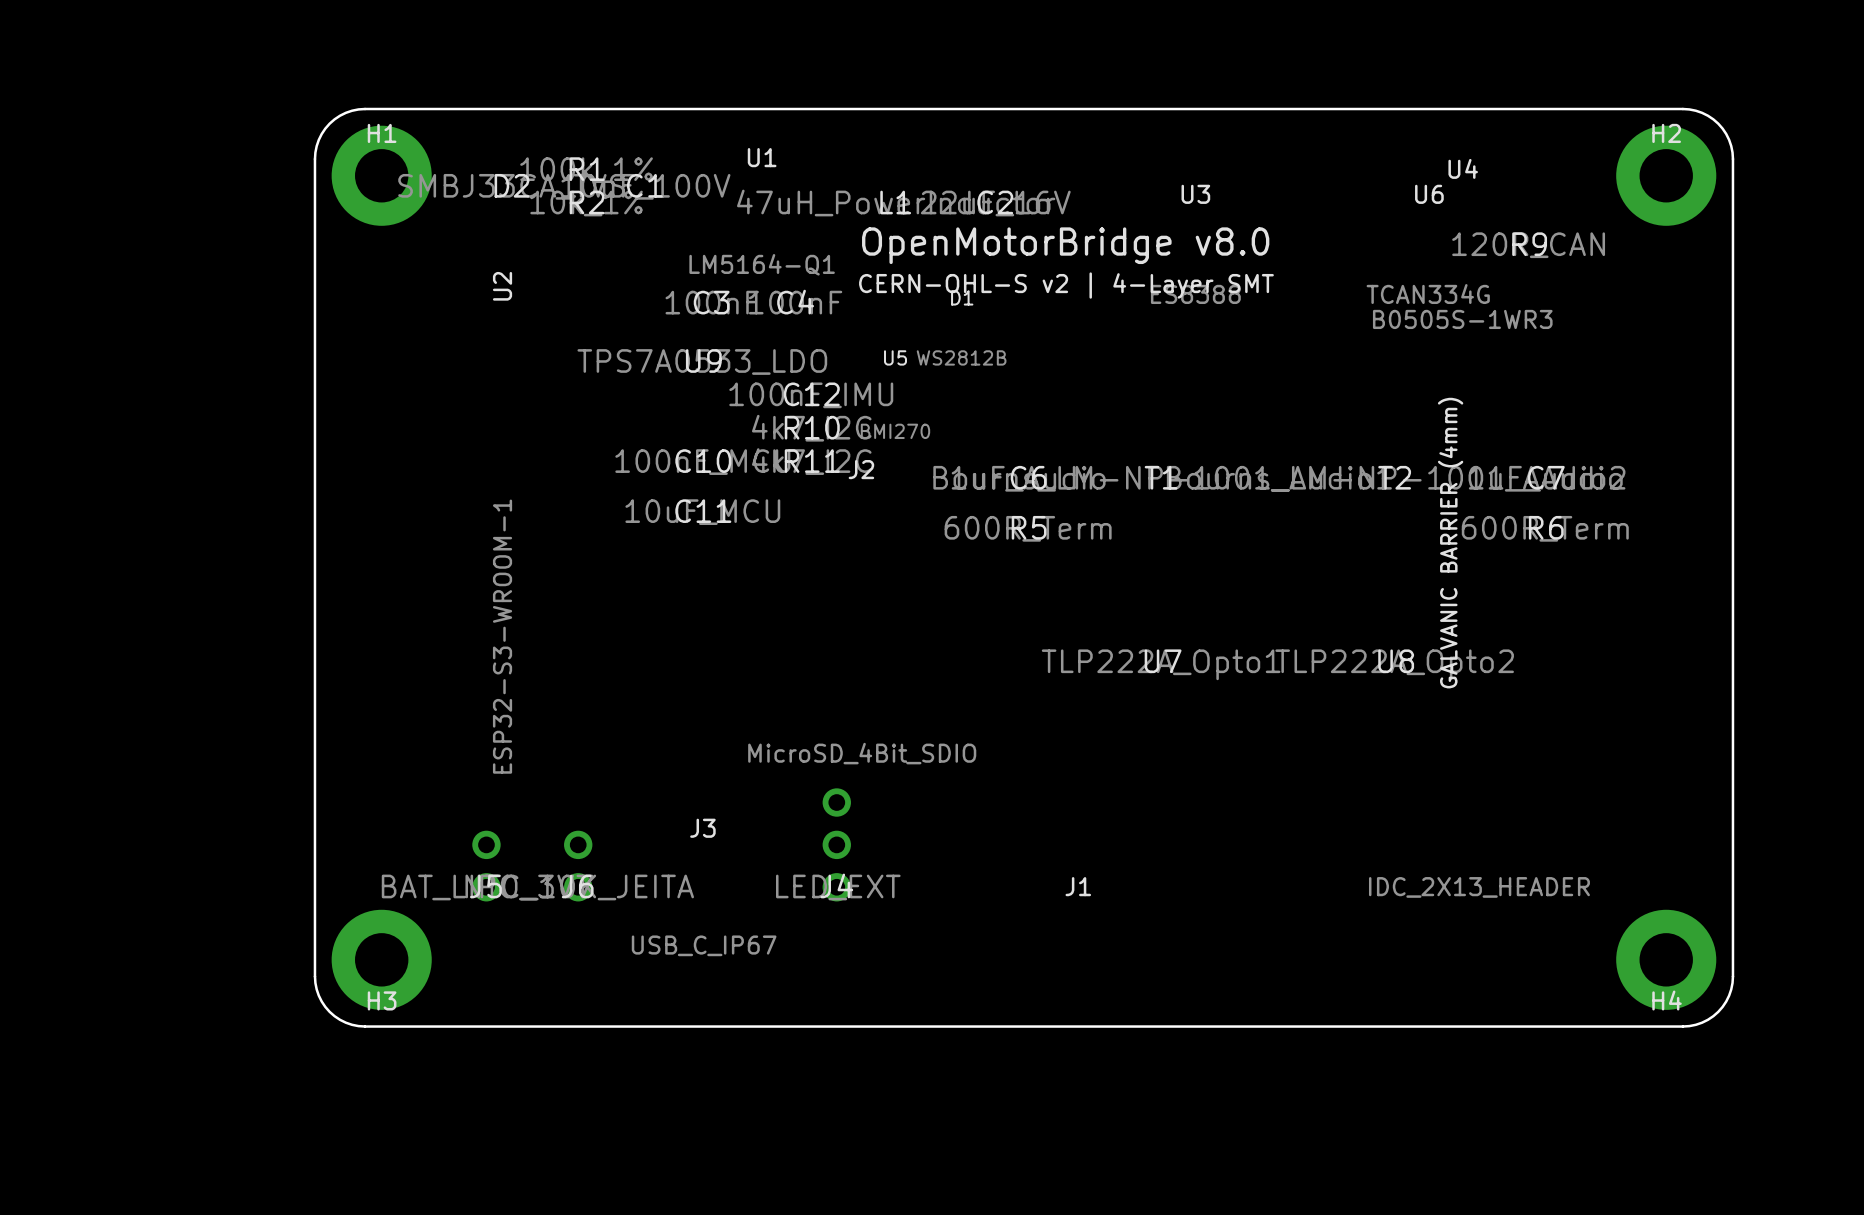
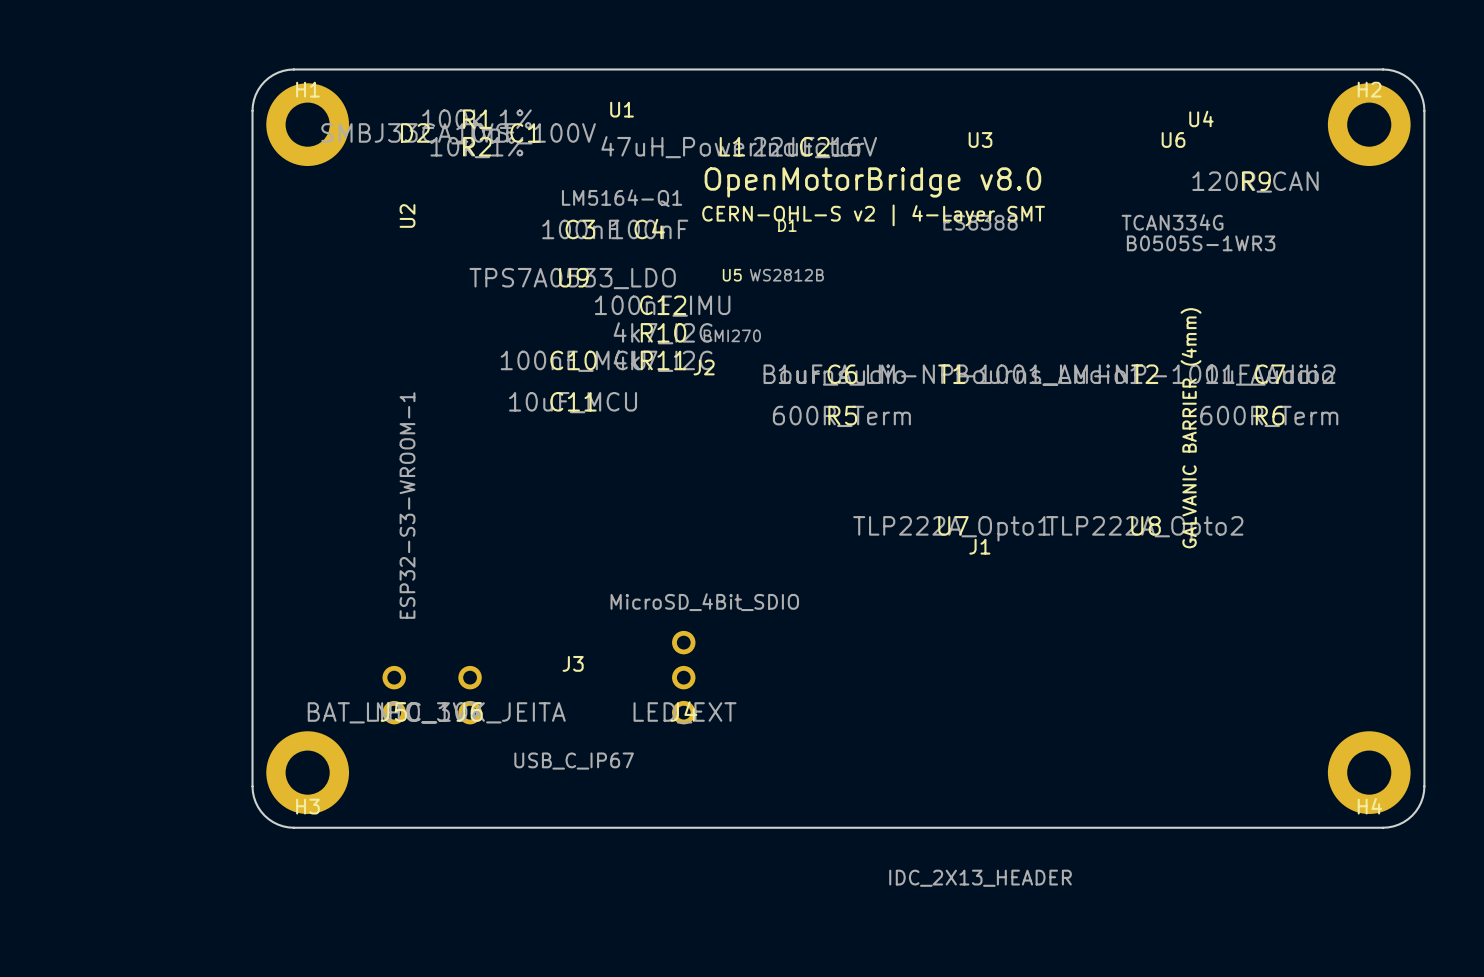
J1 name position: J1 (1078, 886) -> J1 (979, 546)
J1 position: (1327, 887) -> (980, 712)
J1 value position: IDC_2X13_HEADER (1479, 887) -> IDC_2X13_HEADER (980, 878)

